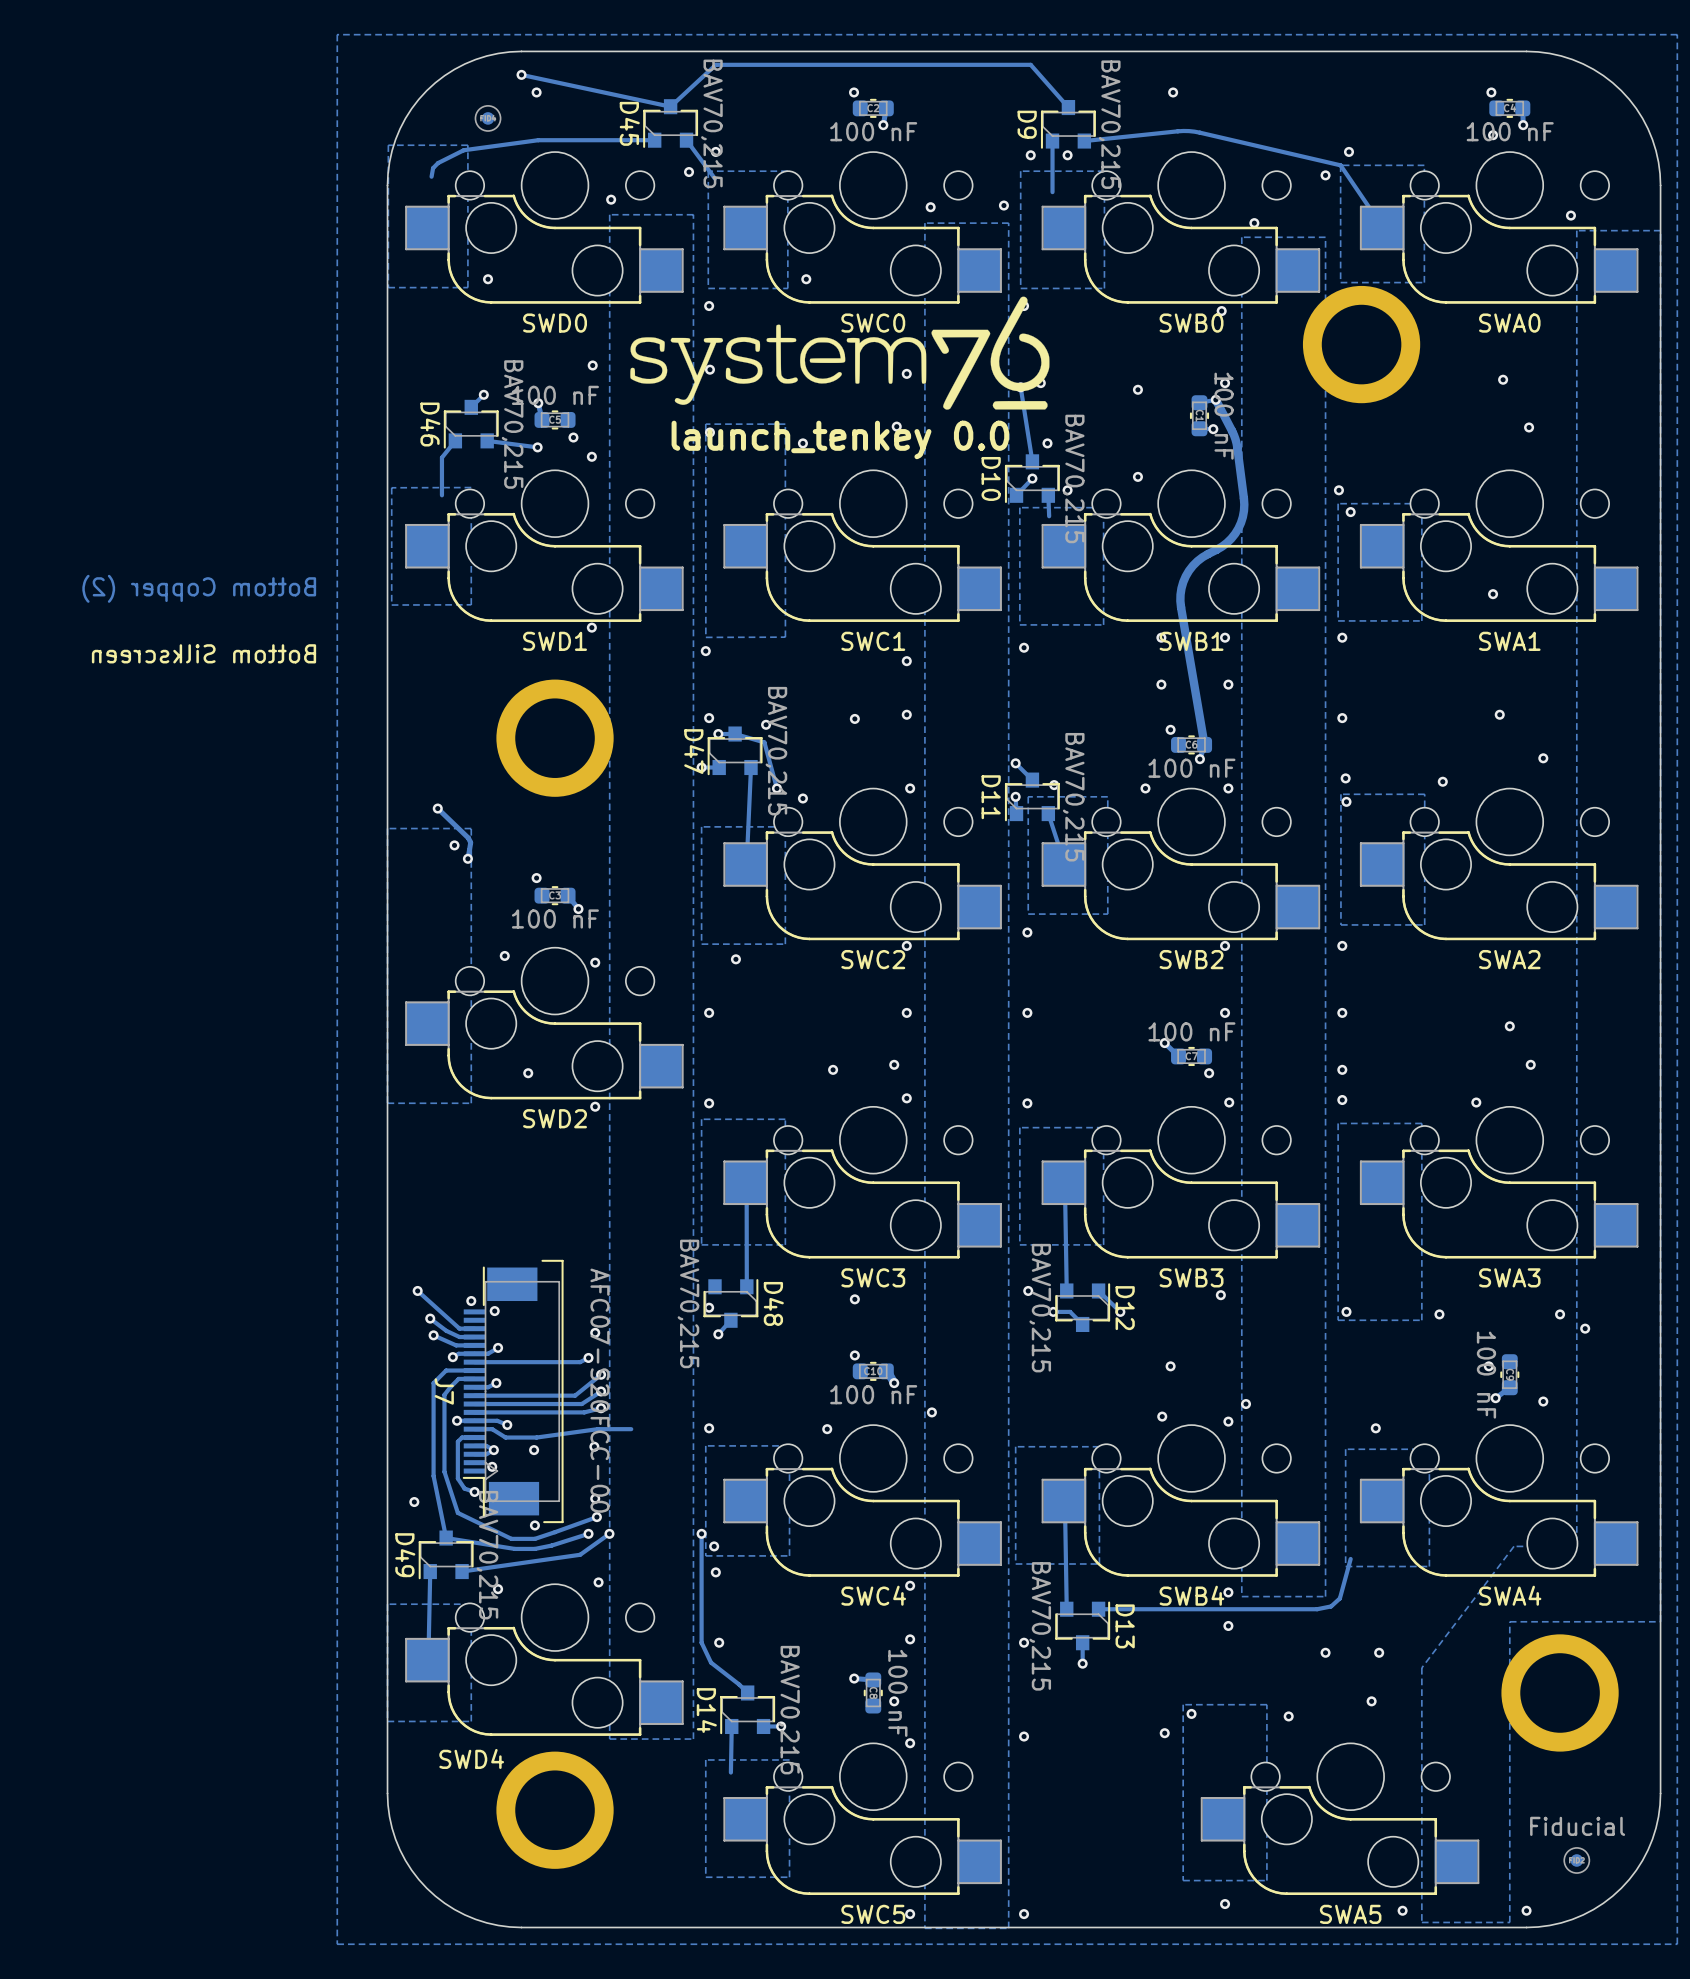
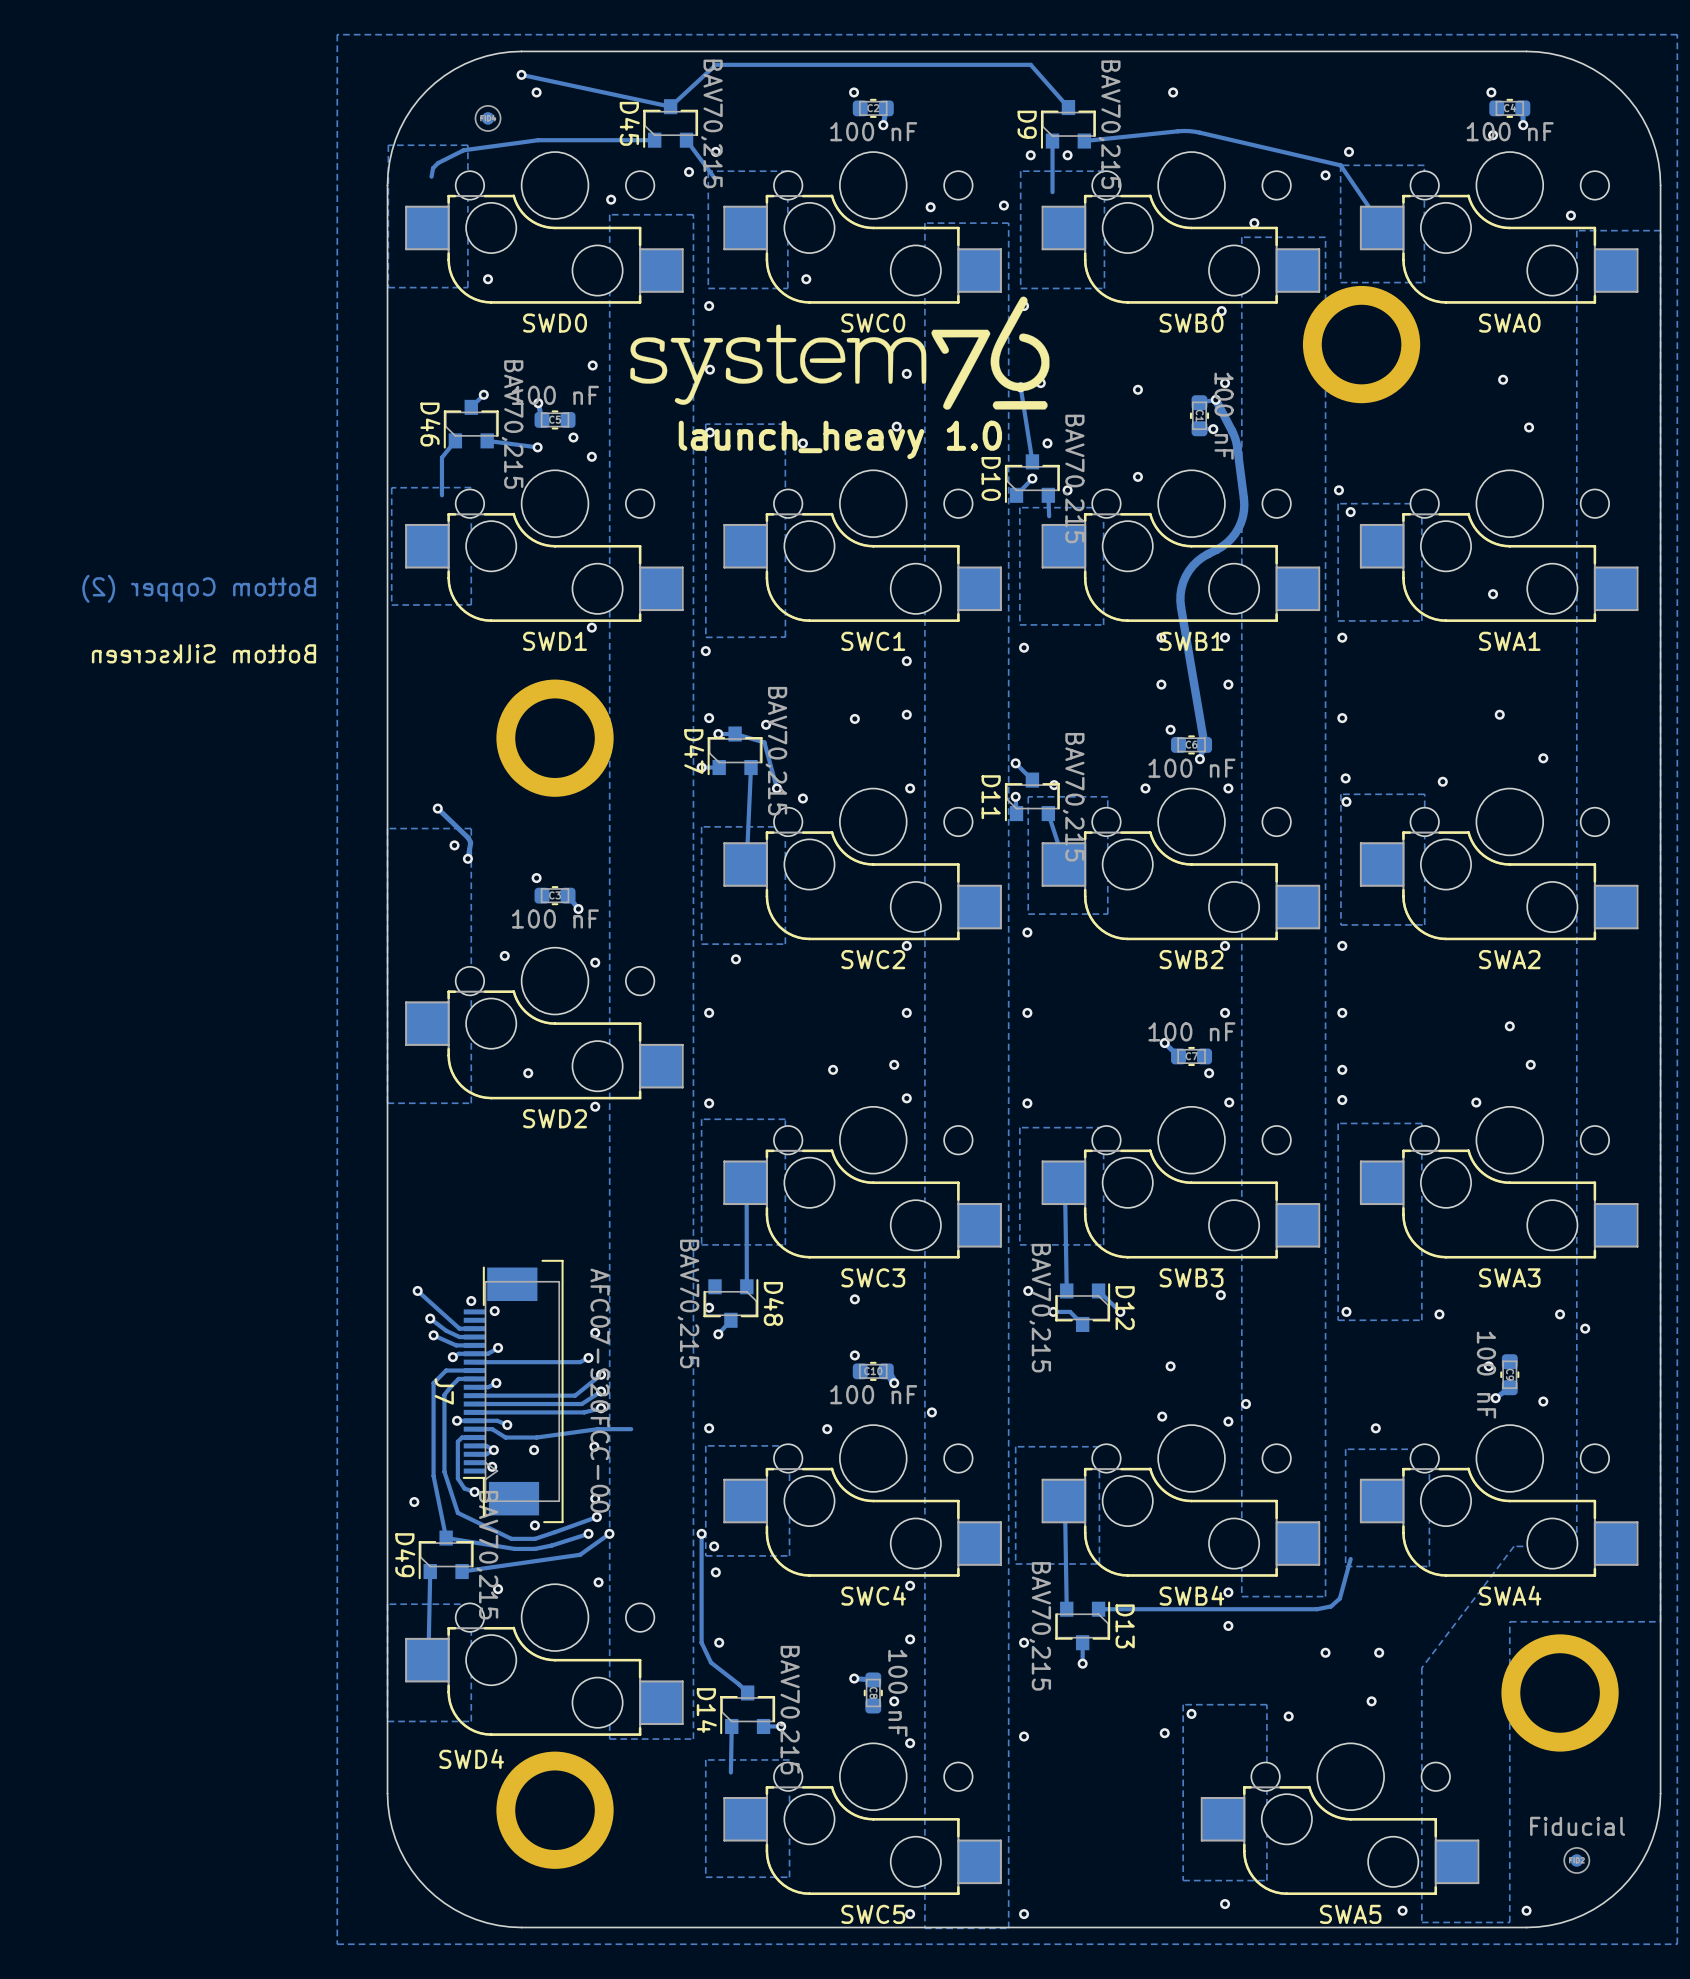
text: launch_tenkey 0.0 (840, 439) -> launch_heavy 1.0 (840, 439)

